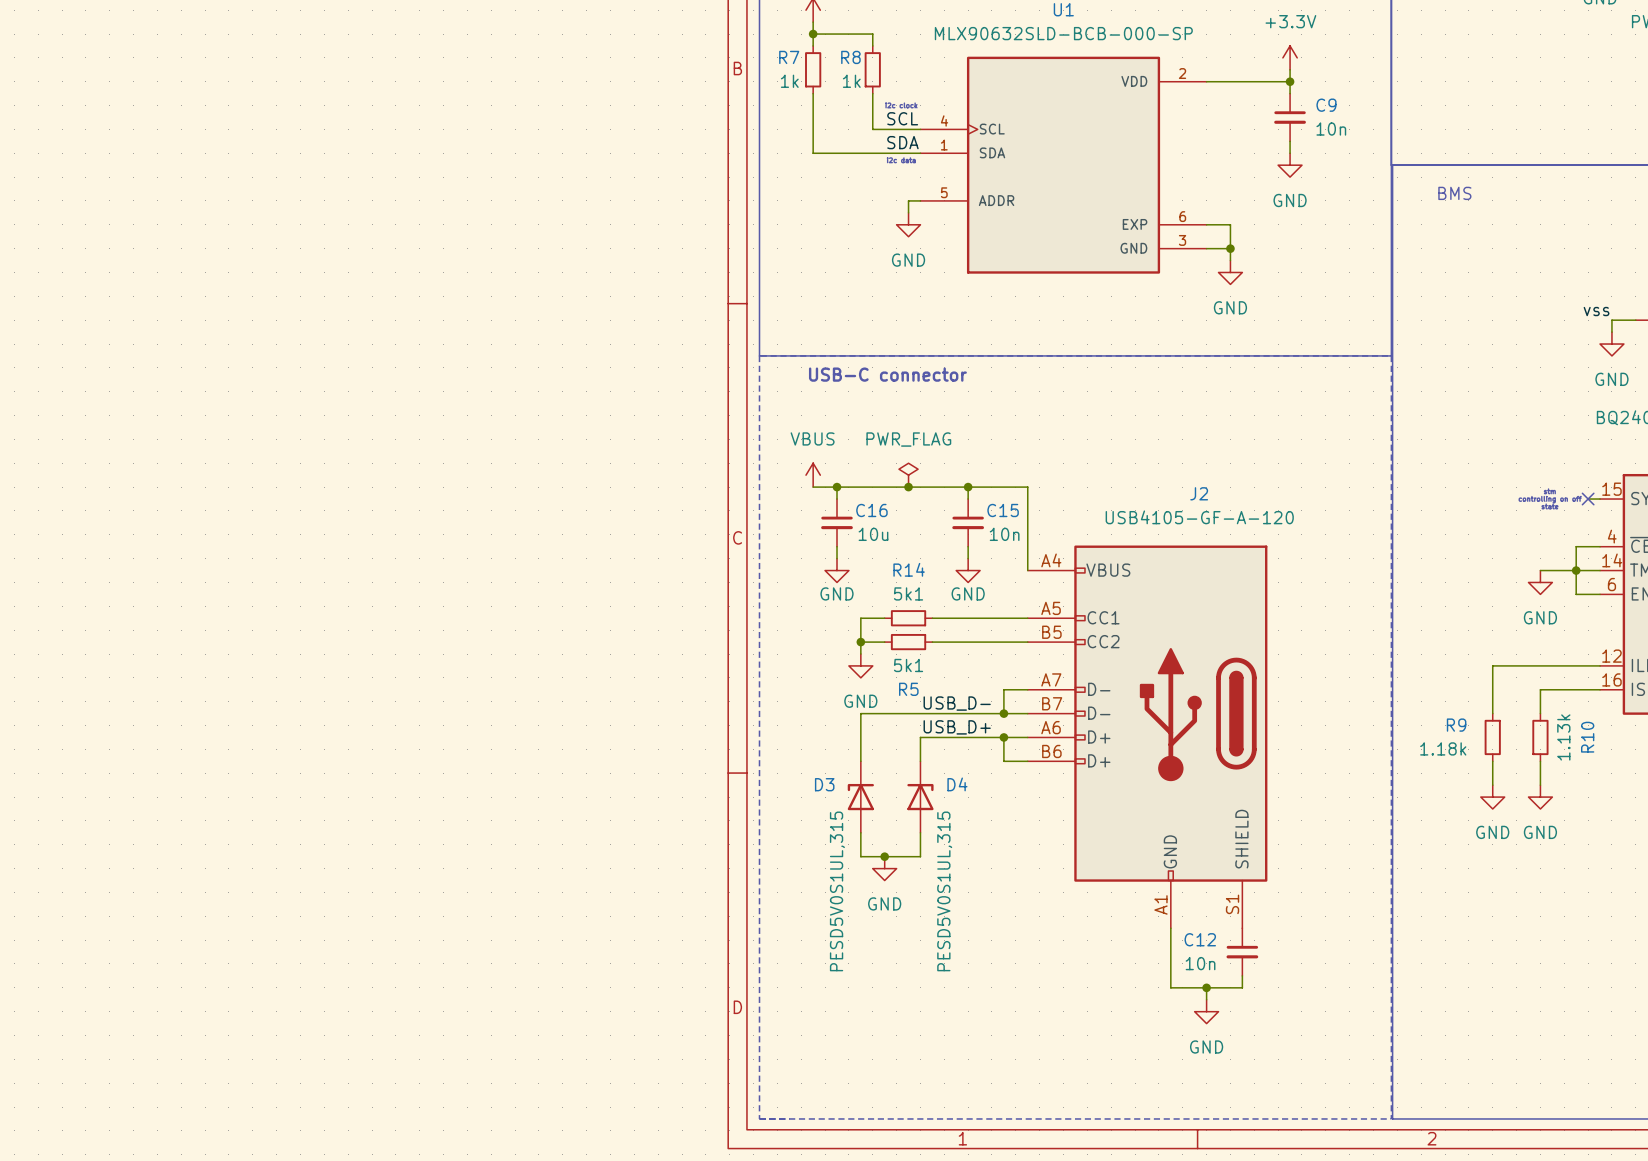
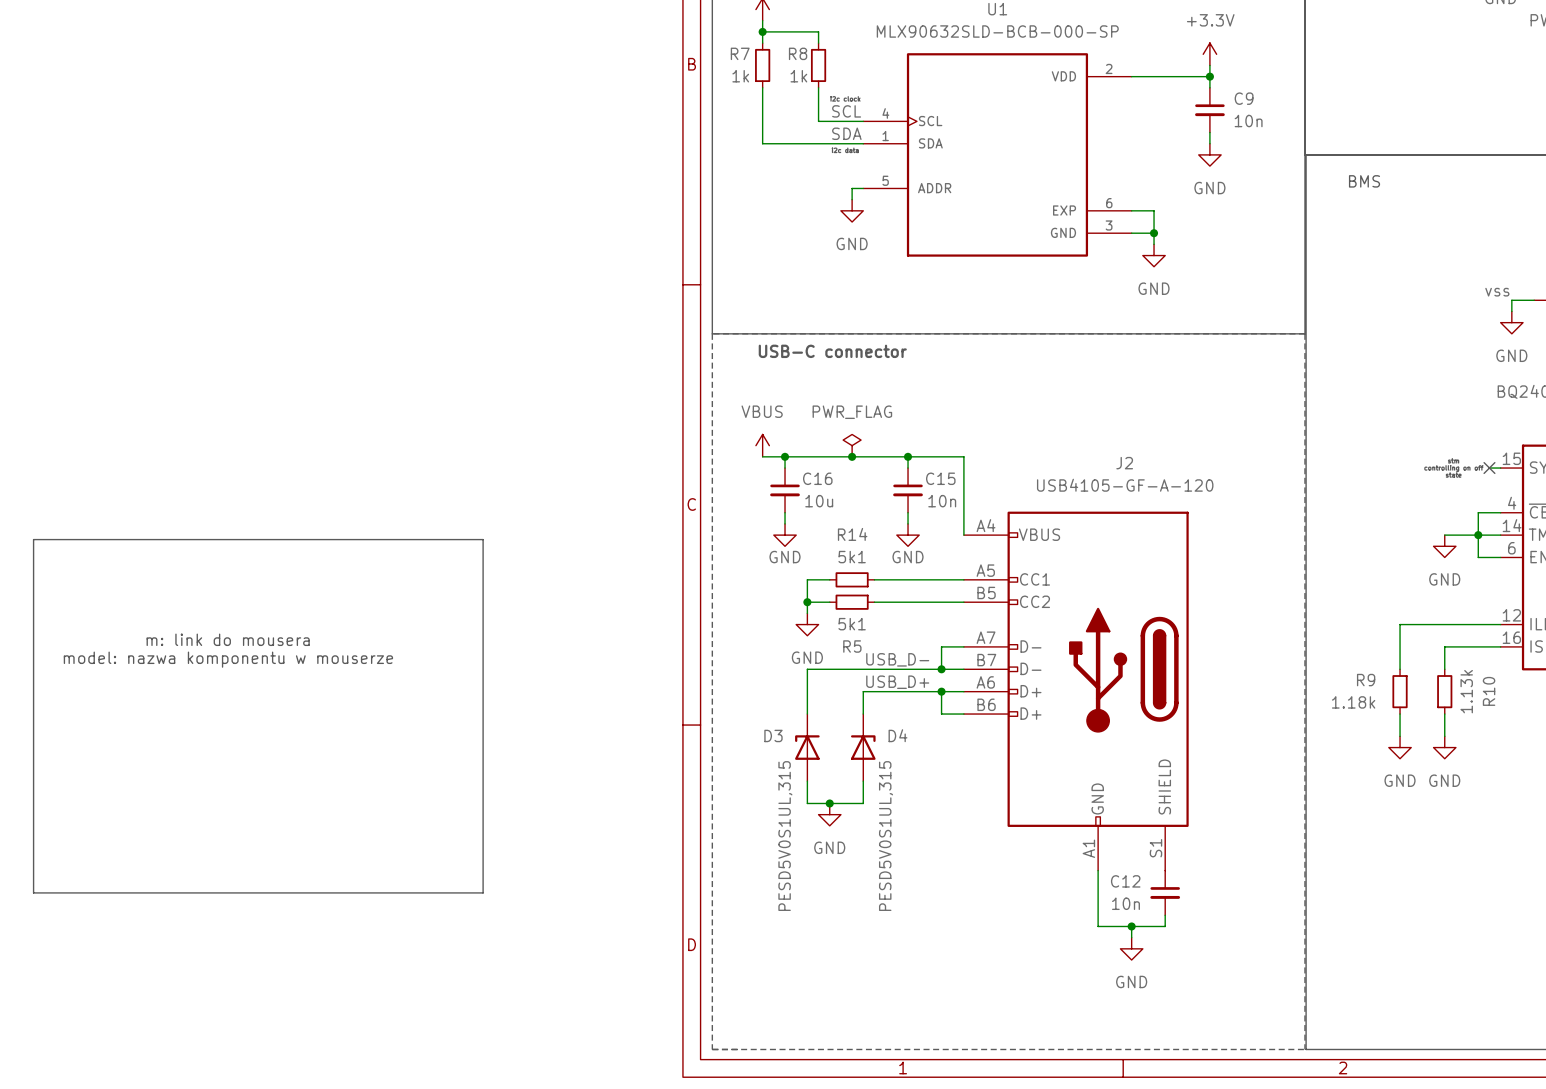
line: none -> (33, 539) (483, 539) (483, 892) (33, 892) (33, 539)
text: none -> m: link do mousera (228, 639)
text: none -> model: nazwa komponentu w mouserze (228, 659)

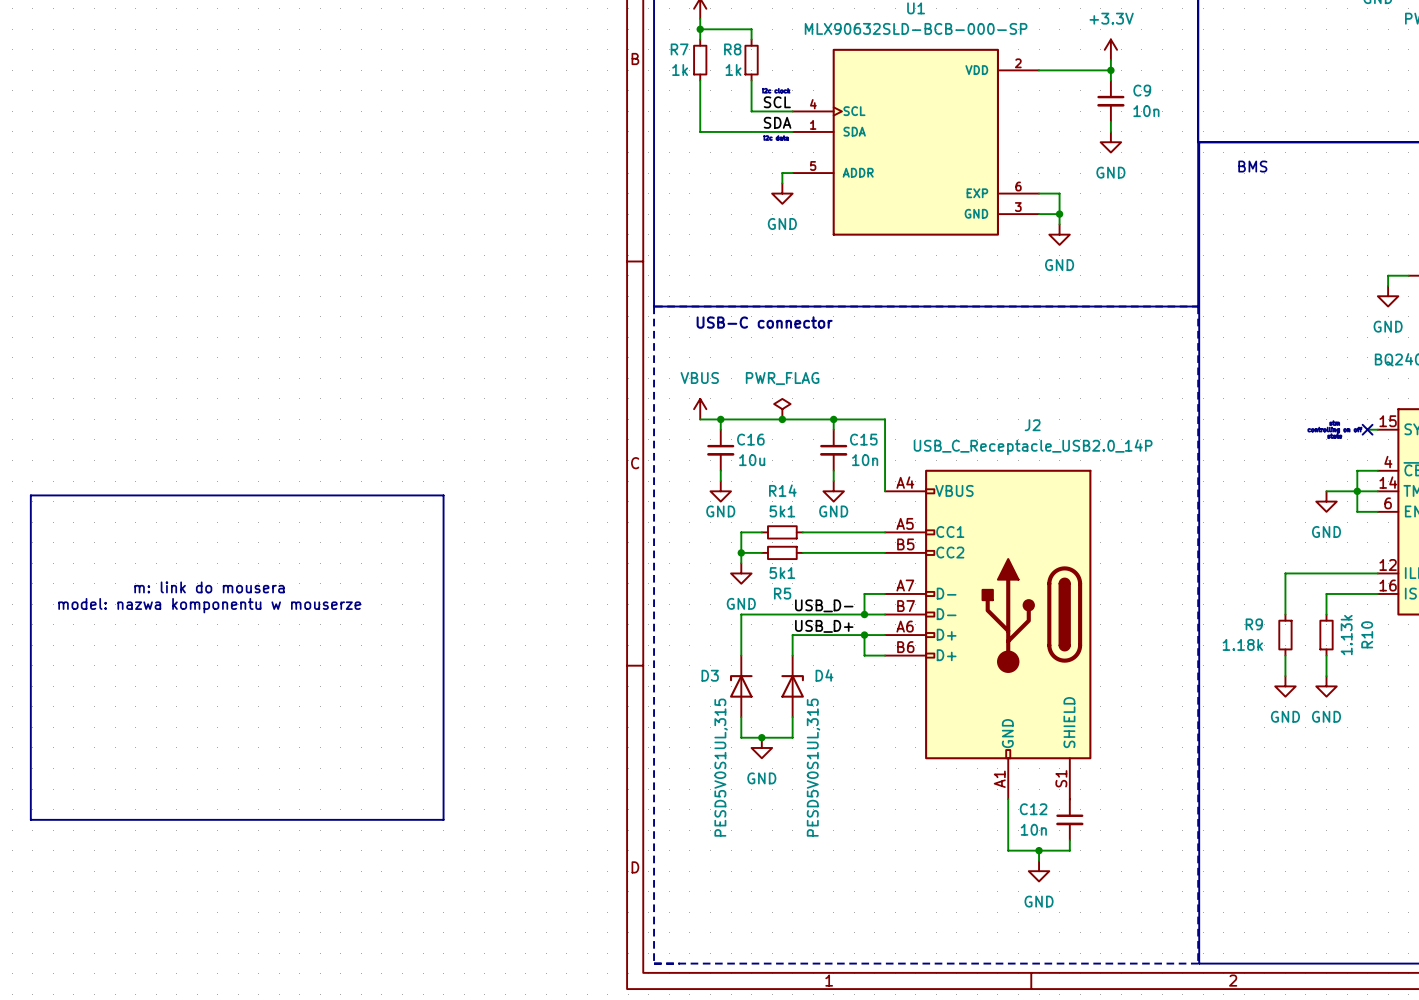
label: vss (1497, 292) -> none
J2 value: USB4105-GF-A-120 (1125, 485) -> USB_C_Receptacle_USB2.0_14P (1033, 447)

